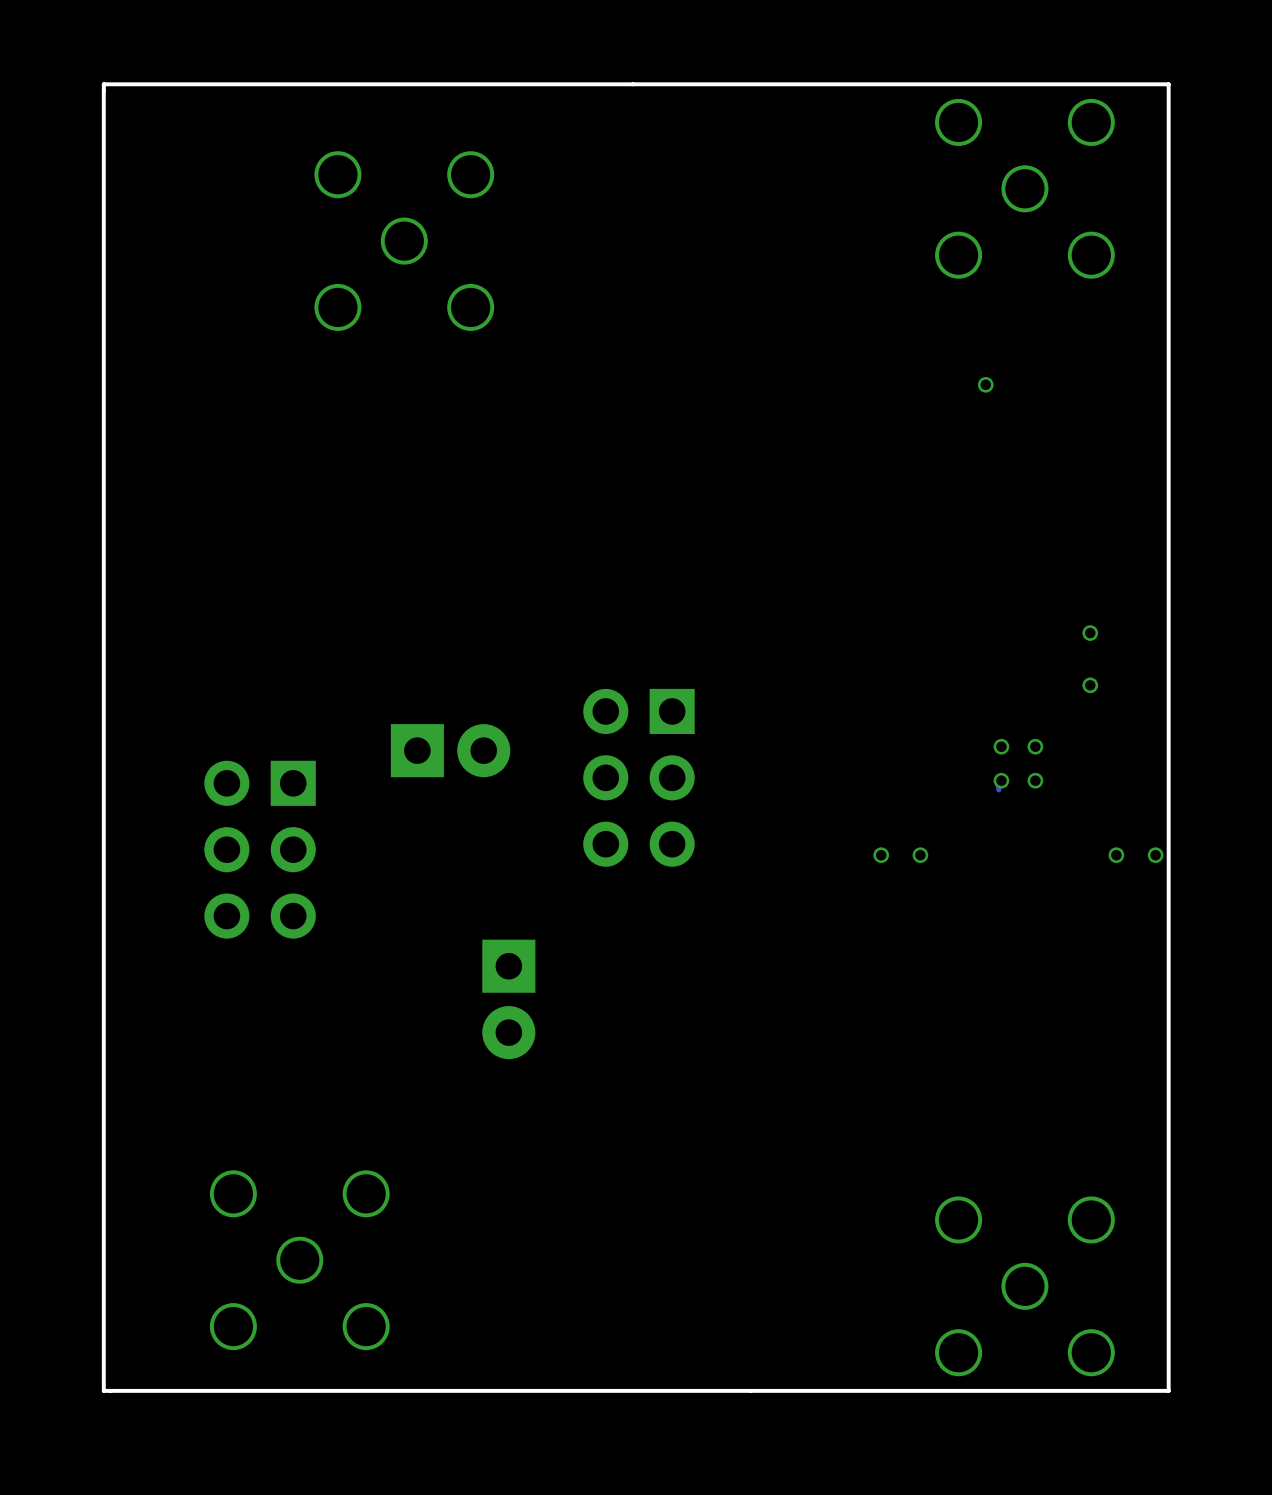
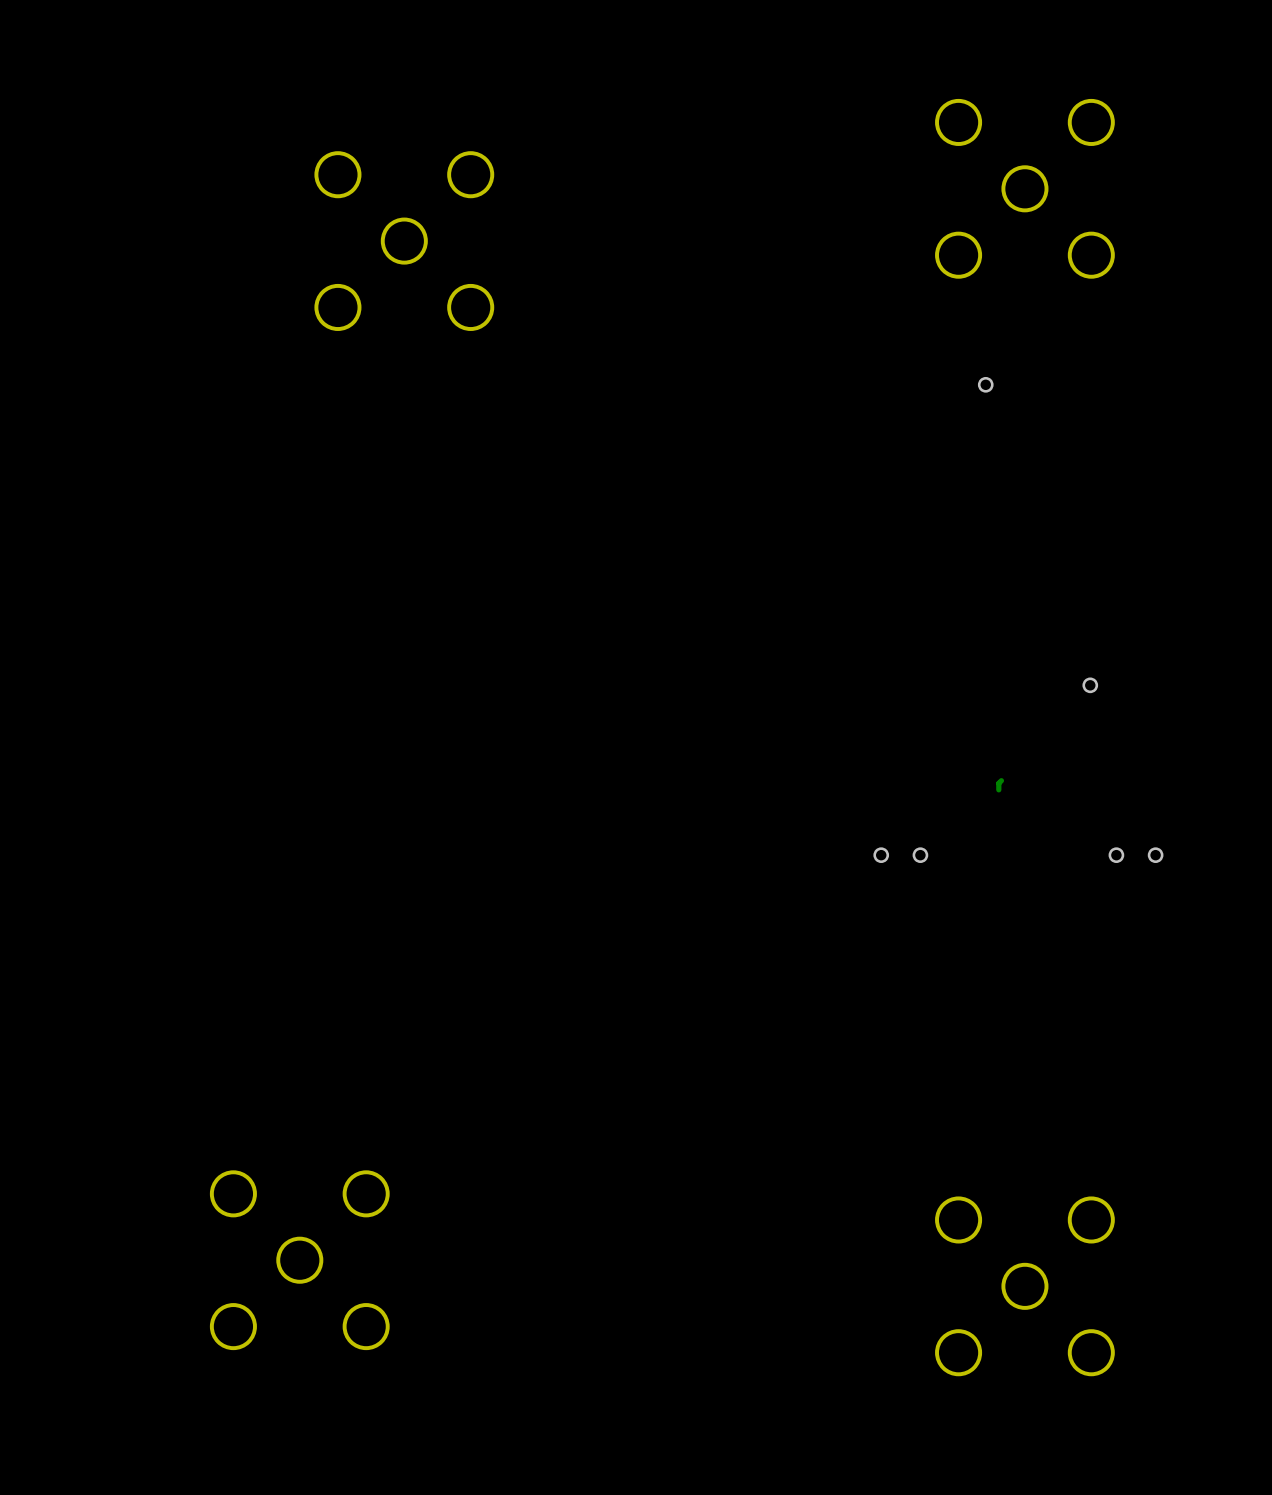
board edge: (1168, 84) (103, 84) (103, 1390) (1168, 1390) (1168, 84) -> none
via: (1090, 633) -> none
via: (1001, 746) -> none
via: (1035, 746) -> none
part: (450, 750) -> none
part: (638, 777) -> none
via: (1001, 780) -> none
via: (1035, 780) -> none
part: (260, 849) -> none
part: (508, 999) -> none

